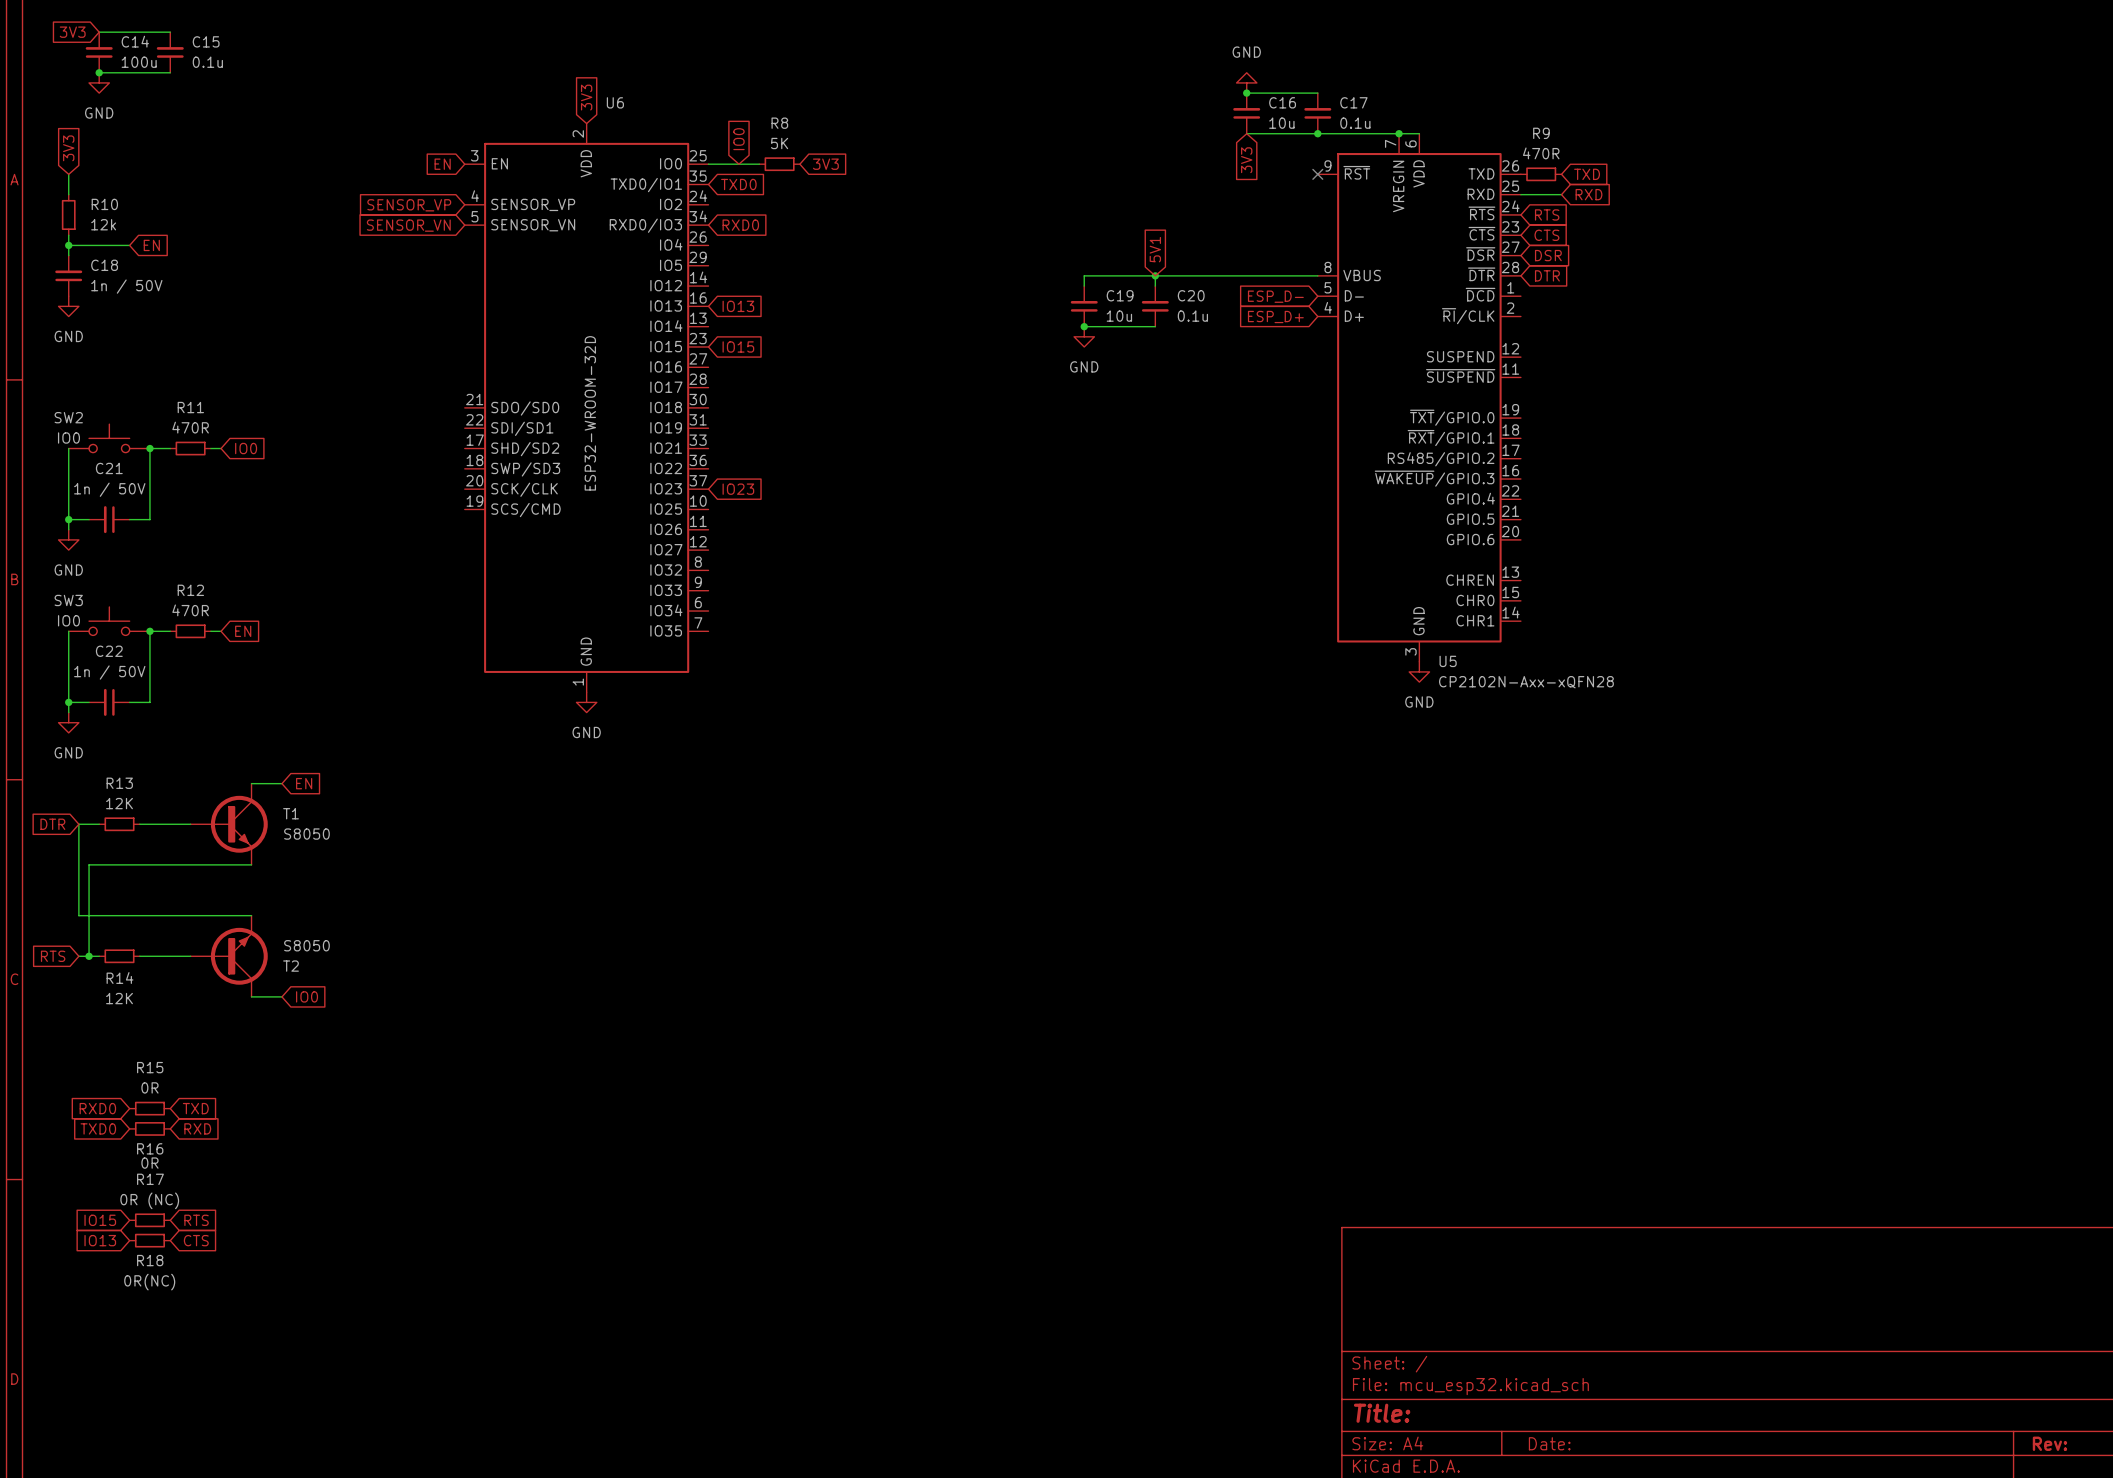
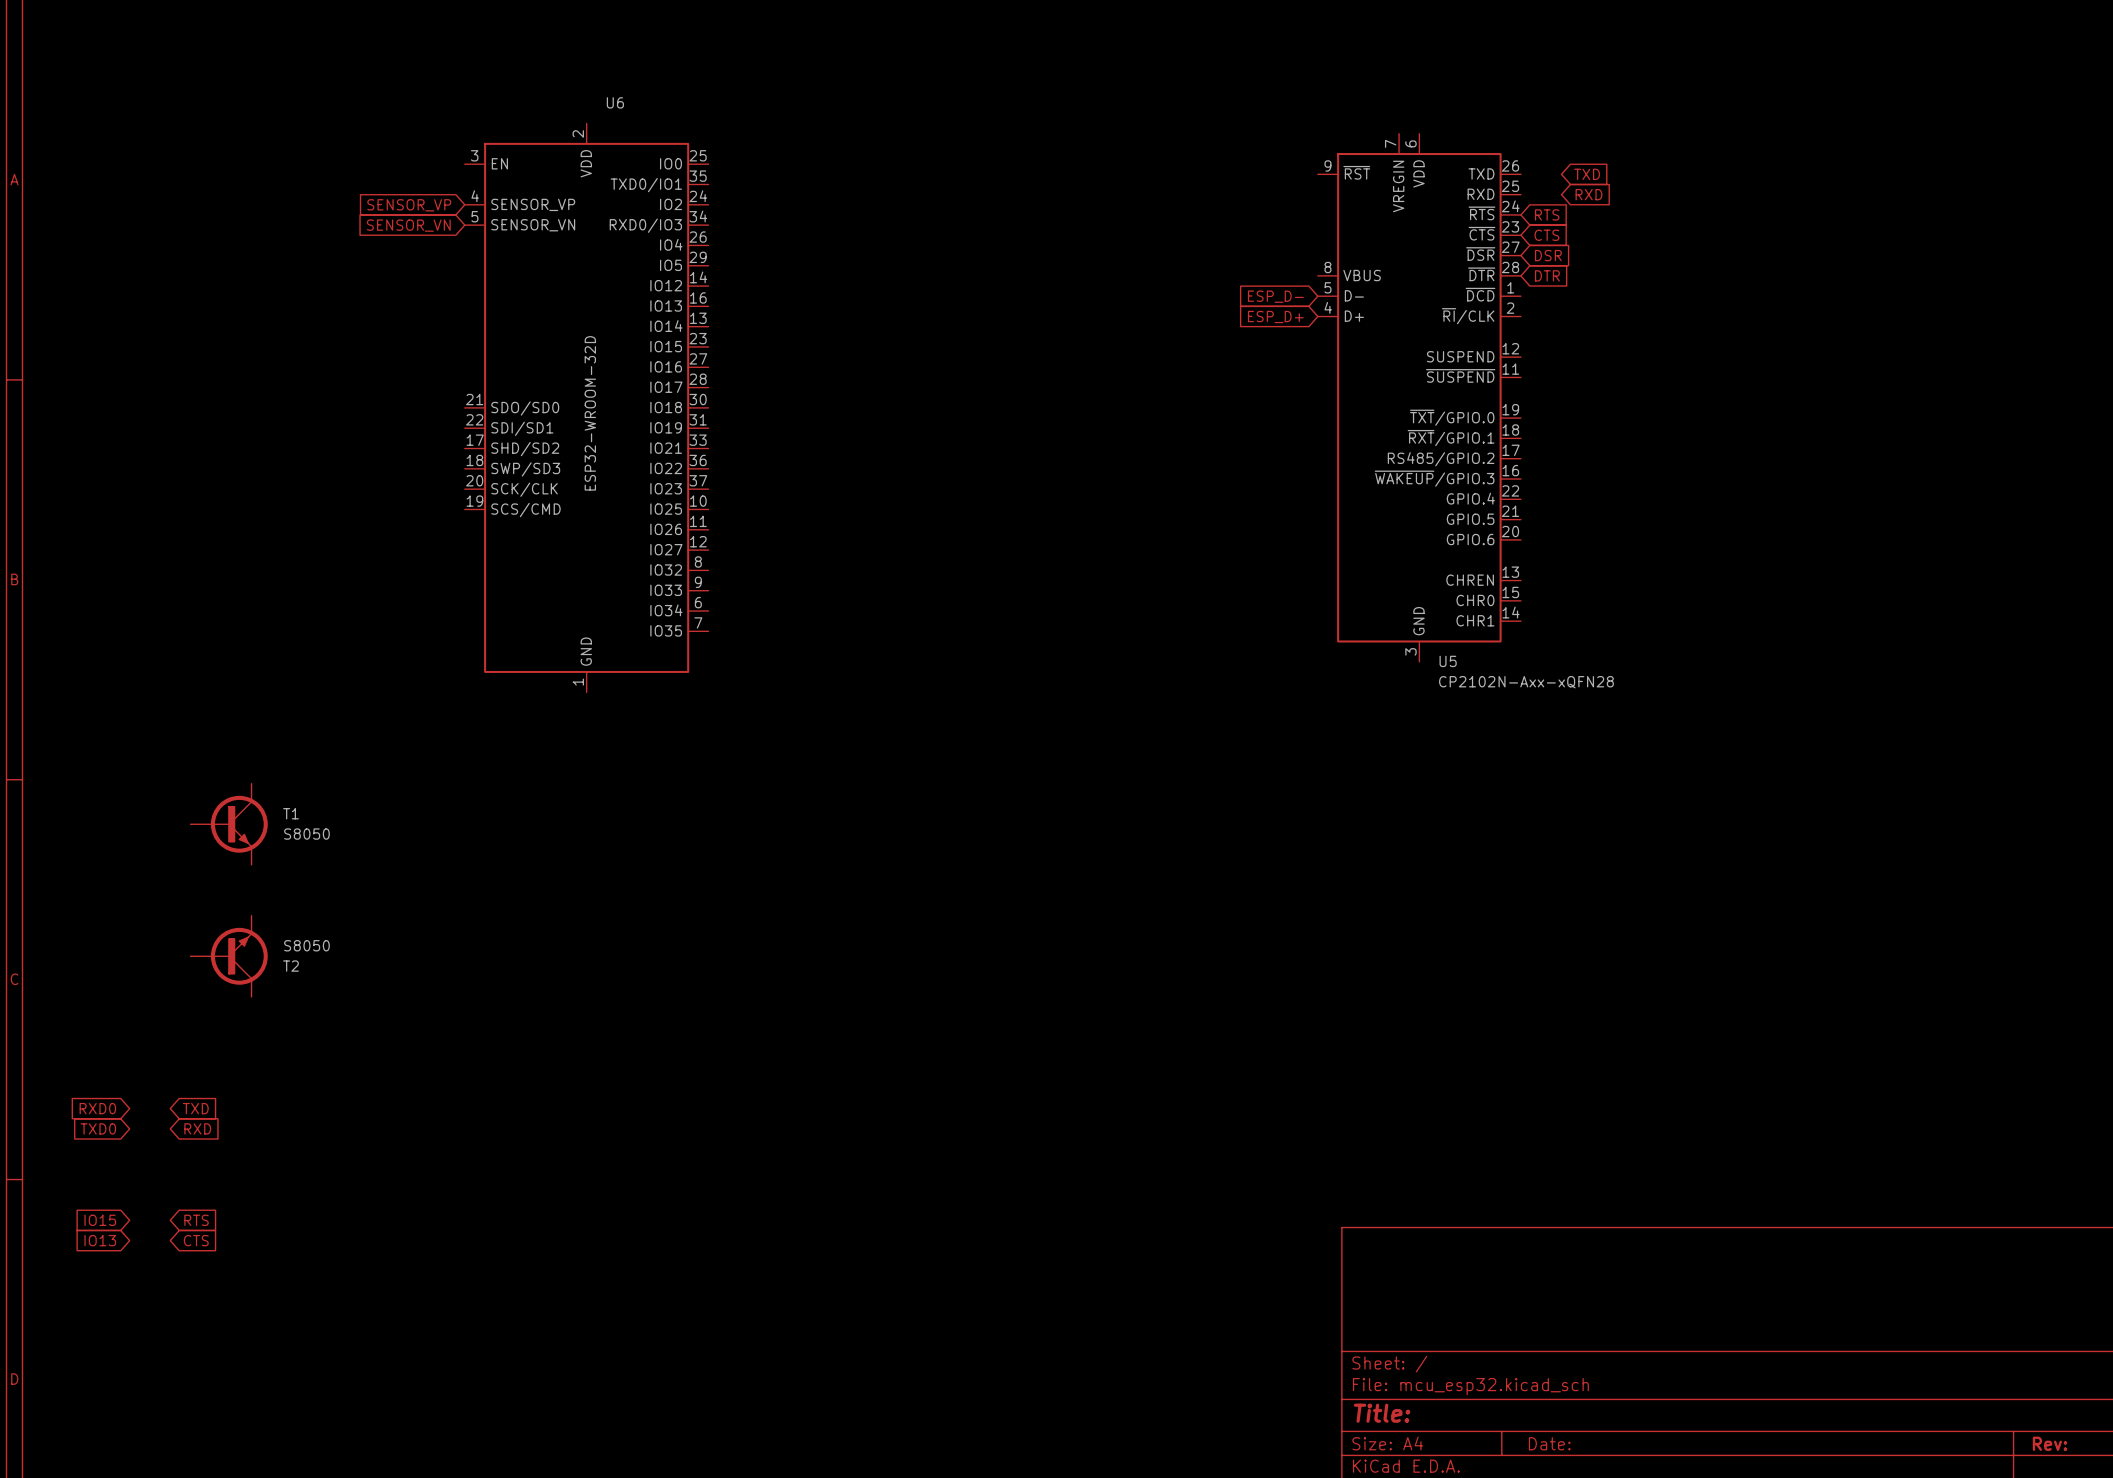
global label: 3V3 (72, 32) -> none
wire: (99, 32) (170, 32) -> none
C14: 100u (99, 52) -> none
C15: 0.1u (170, 52) -> none
wire: (99, 72) (170, 72) -> none
junction: (99, 72) -> none
power symbol: GND (99, 82) -> none
power symbol: GND (1246, 82) -> none
wire: (1246, 93) (1317, 93) -> none
junction: (1246, 93) -> none
global label: 3V3 (586, 97) -> none
C16: 10u (1246, 113) -> none
C17: 0.1u (1317, 113) -> none
wire: (1246, 133) (1419, 133) -> none
junction: (1317, 133) -> none
junction: (1399, 133) -> none
global label: IO0 (738, 139) -> none
global label: 3V3 (68, 148) -> none
global label: 3V3 (1246, 160) -> none
global label: EN (442, 164) -> none
wire: (708, 164) (759, 164) -> none
R8: 5K (779, 164) -> none
global label: 3V3 (825, 164) -> none
wire: (68, 174) (68, 194) -> none
no-connect mark: (1317, 174) -> none
R9: 470R (1541, 174) -> none
global label: TXD0 (738, 184) -> none
wire: (1520, 194) (1561, 194) -> none
R10: 12k (68, 214) -> none
global label: RXD0 (740, 225) -> none
wire: (68, 235) (68, 255) -> none
wire: (68, 245) (129, 245) -> none
junction: (68, 245) -> none
global label: EN (151, 245) -> none
global label: 5V1 (1155, 249) -> none
C18: 1n / 50V (68, 275) -> none
wire: (1155, 275) (1155, 286) -> none
junction: (1155, 275) -> none
wire: (1317, 275) (1084, 275) (1084, 286) -> none
power symbol: GND (68, 306) -> none
global label: IO13 (738, 306) -> none
C19: 10u (1084, 306) -> none
C20: 0.1u (1155, 306) -> none
wire: (1084, 326) (1155, 326) -> none
junction: (1084, 326) -> none
power symbol: GND (1084, 336) -> none
global label: IO15 (738, 346) -> none
SW2: IO0 (109, 438) -> none
wire: (68, 448) (68, 529) -> none
junction: (149, 448) -> none
wire: (170, 448) (149, 448) (149, 519) (129, 519) -> none
R11: 470R (190, 448) -> none
wire: (210, 448) (221, 448) -> none
global label: IO0 (246, 448) -> none
global label: IO23 (738, 489) -> none
wire: (68, 519) (89, 519) -> none
junction: (68, 519) -> none
C21: 1n / 50V (109, 519) -> none
power symbol: GND (68, 539) -> none
SW3: IO0 (109, 621) -> none
wire: (68, 631) (68, 712) -> none
junction: (149, 631) -> none
wire: (170, 631) (149, 631) (149, 702) (129, 702) -> none
R12: 470R (190, 631) -> none
wire: (210, 631) (221, 631) -> none
global label: EN (243, 631) -> none
power symbol: GND (1419, 671) -> none
wire: (68, 702) (89, 702) -> none
junction: (68, 702) -> none
C22: 1n / 50V (109, 702) -> none
power symbol: GND (586, 702) -> none
power symbol: GND (68, 722) -> none
wire: (251, 783) (281, 783) -> none
global label: EN (304, 783) -> none
global label: DTR (52, 824) -> none
wire: (99, 824) (78, 824) (78, 915) (251, 915) -> none
R13: 12K (119, 824) -> none
wire: (139, 824) (190, 824) -> none
wire: (251, 864) (89, 864) (89, 956) -> none
global label: RTS (53, 956) -> none
wire: (78, 956) (99, 956) -> none
junction: (89, 956) -> none
R14: 12K (119, 956) -> none
wire: (139, 956) (190, 956) -> none
wire: (251, 996) (281, 996) -> none
global label: IO0 (307, 996) -> none
R15: 0R (149, 1108) -> none
R16: 0R (149, 1128) -> none
R17: 0R (NC) (149, 1220) -> none
R18: 0R(NC) (149, 1240) -> none

